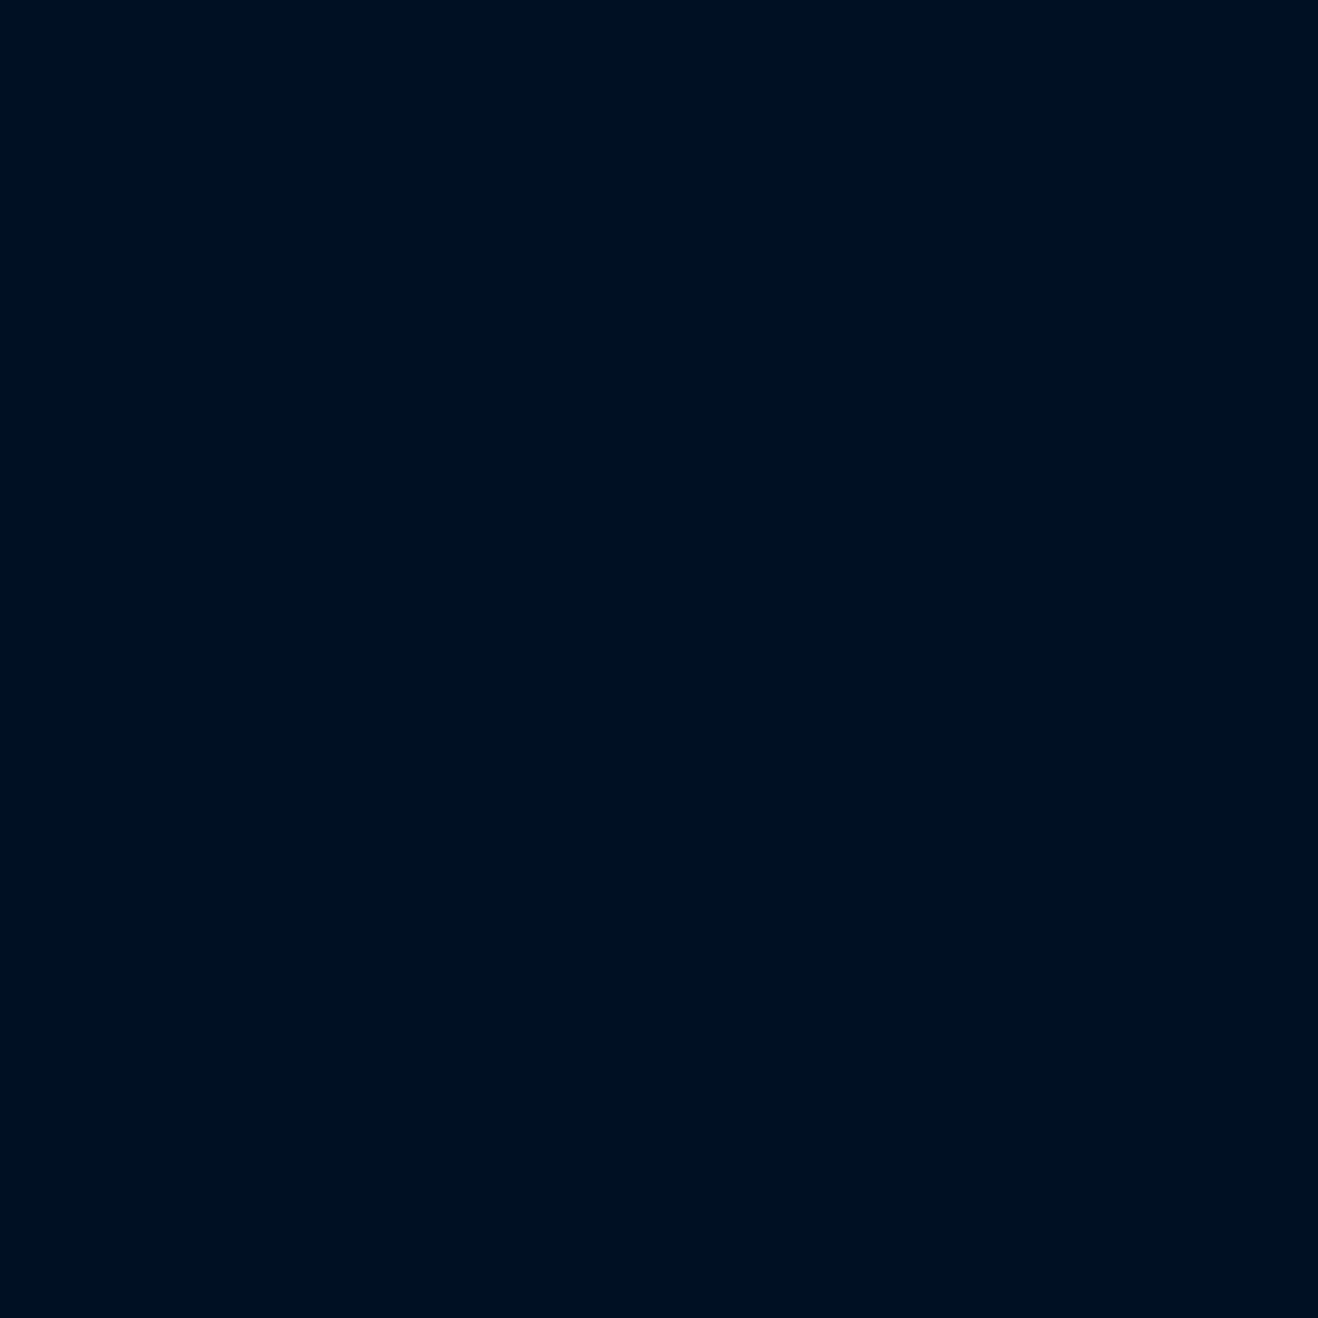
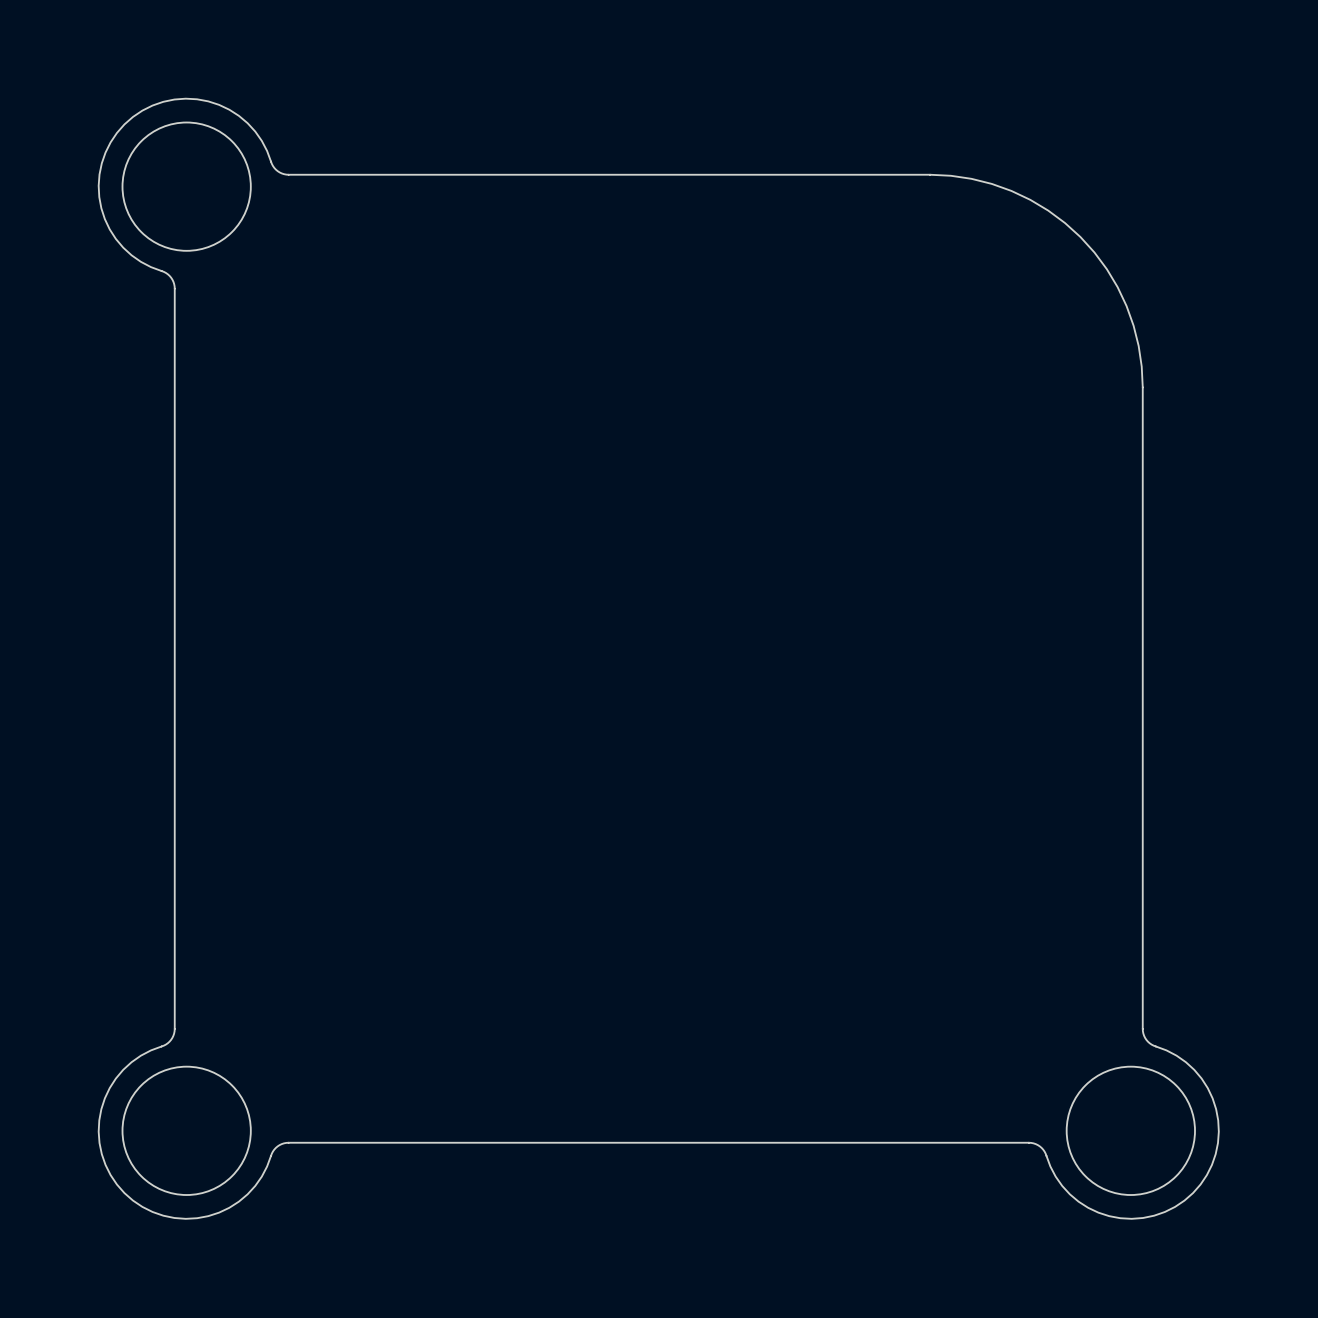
round board edge: none -> [121, 121, 252, 252]
board edge: none -> (271, 161) (255, 131) (229, 109) (197, 99) (174, 99) (142, 110) (124, 124) (110, 142) (99, 174) (101, 208) (115, 238) (140, 261) (167, 274) (173, 281) (174, 288) (174, 1028) (172, 1037) (167, 1043) (140, 1055) (123, 1069) (109, 1088) (101, 1109) (98, 1131) (101, 1154) (110, 1175) (124, 1193) (142, 1206) (163, 1215) (185, 1218) (208, 1216) (229, 1207) (247, 1194) (261, 1176) (274, 1149) (279, 1145) (288, 1142) (1028, 1142) (1037, 1145) (1043, 1149) (1055, 1176) (1069, 1194) (1088, 1207) (1109, 1216) (1131, 1218) (1154, 1215) (1175, 1206) (1193, 1193) (1206, 1175) (1215, 1154) (1218, 1131) (1216, 1109) (1207, 1088) (1194, 1069) (1176, 1055) (1149, 1043) (1144, 1035) (1142, 1028) (1141, 366) (1133, 325) (1126, 306) (1117, 287) (1094, 252) (1065, 223) (1030, 199) (991, 183) (950, 175) (288, 174) (277, 171) (271, 161)
round board edge: none -> [121, 1065, 252, 1196]
round board edge: none -> [1065, 1065, 1196, 1196]

